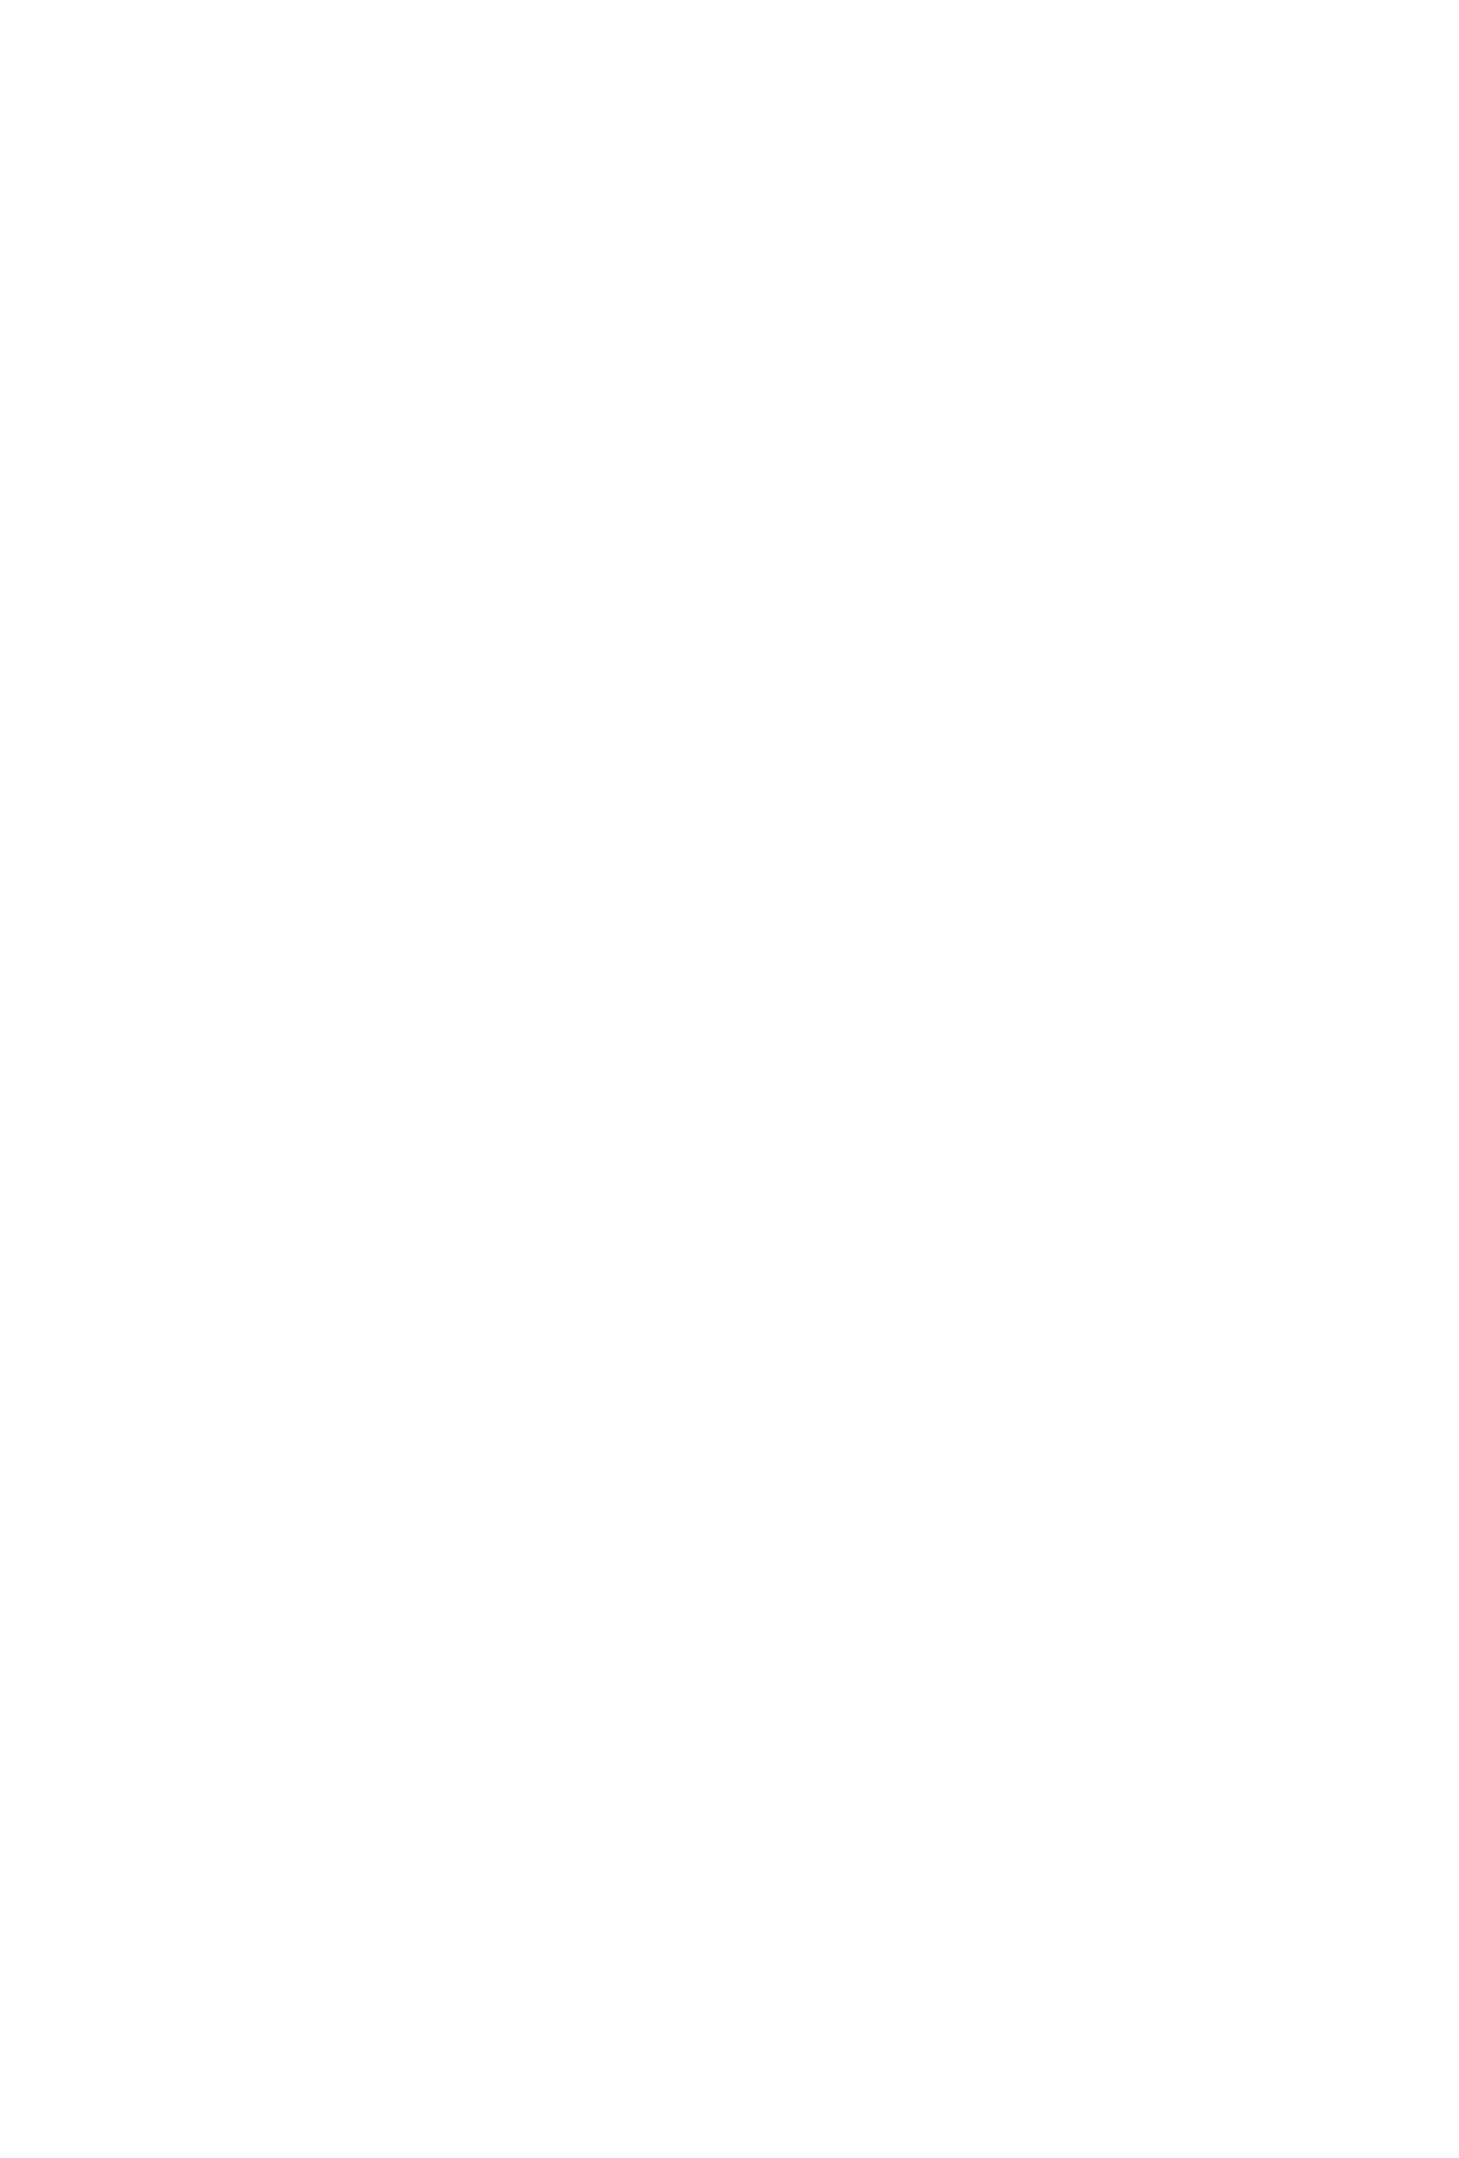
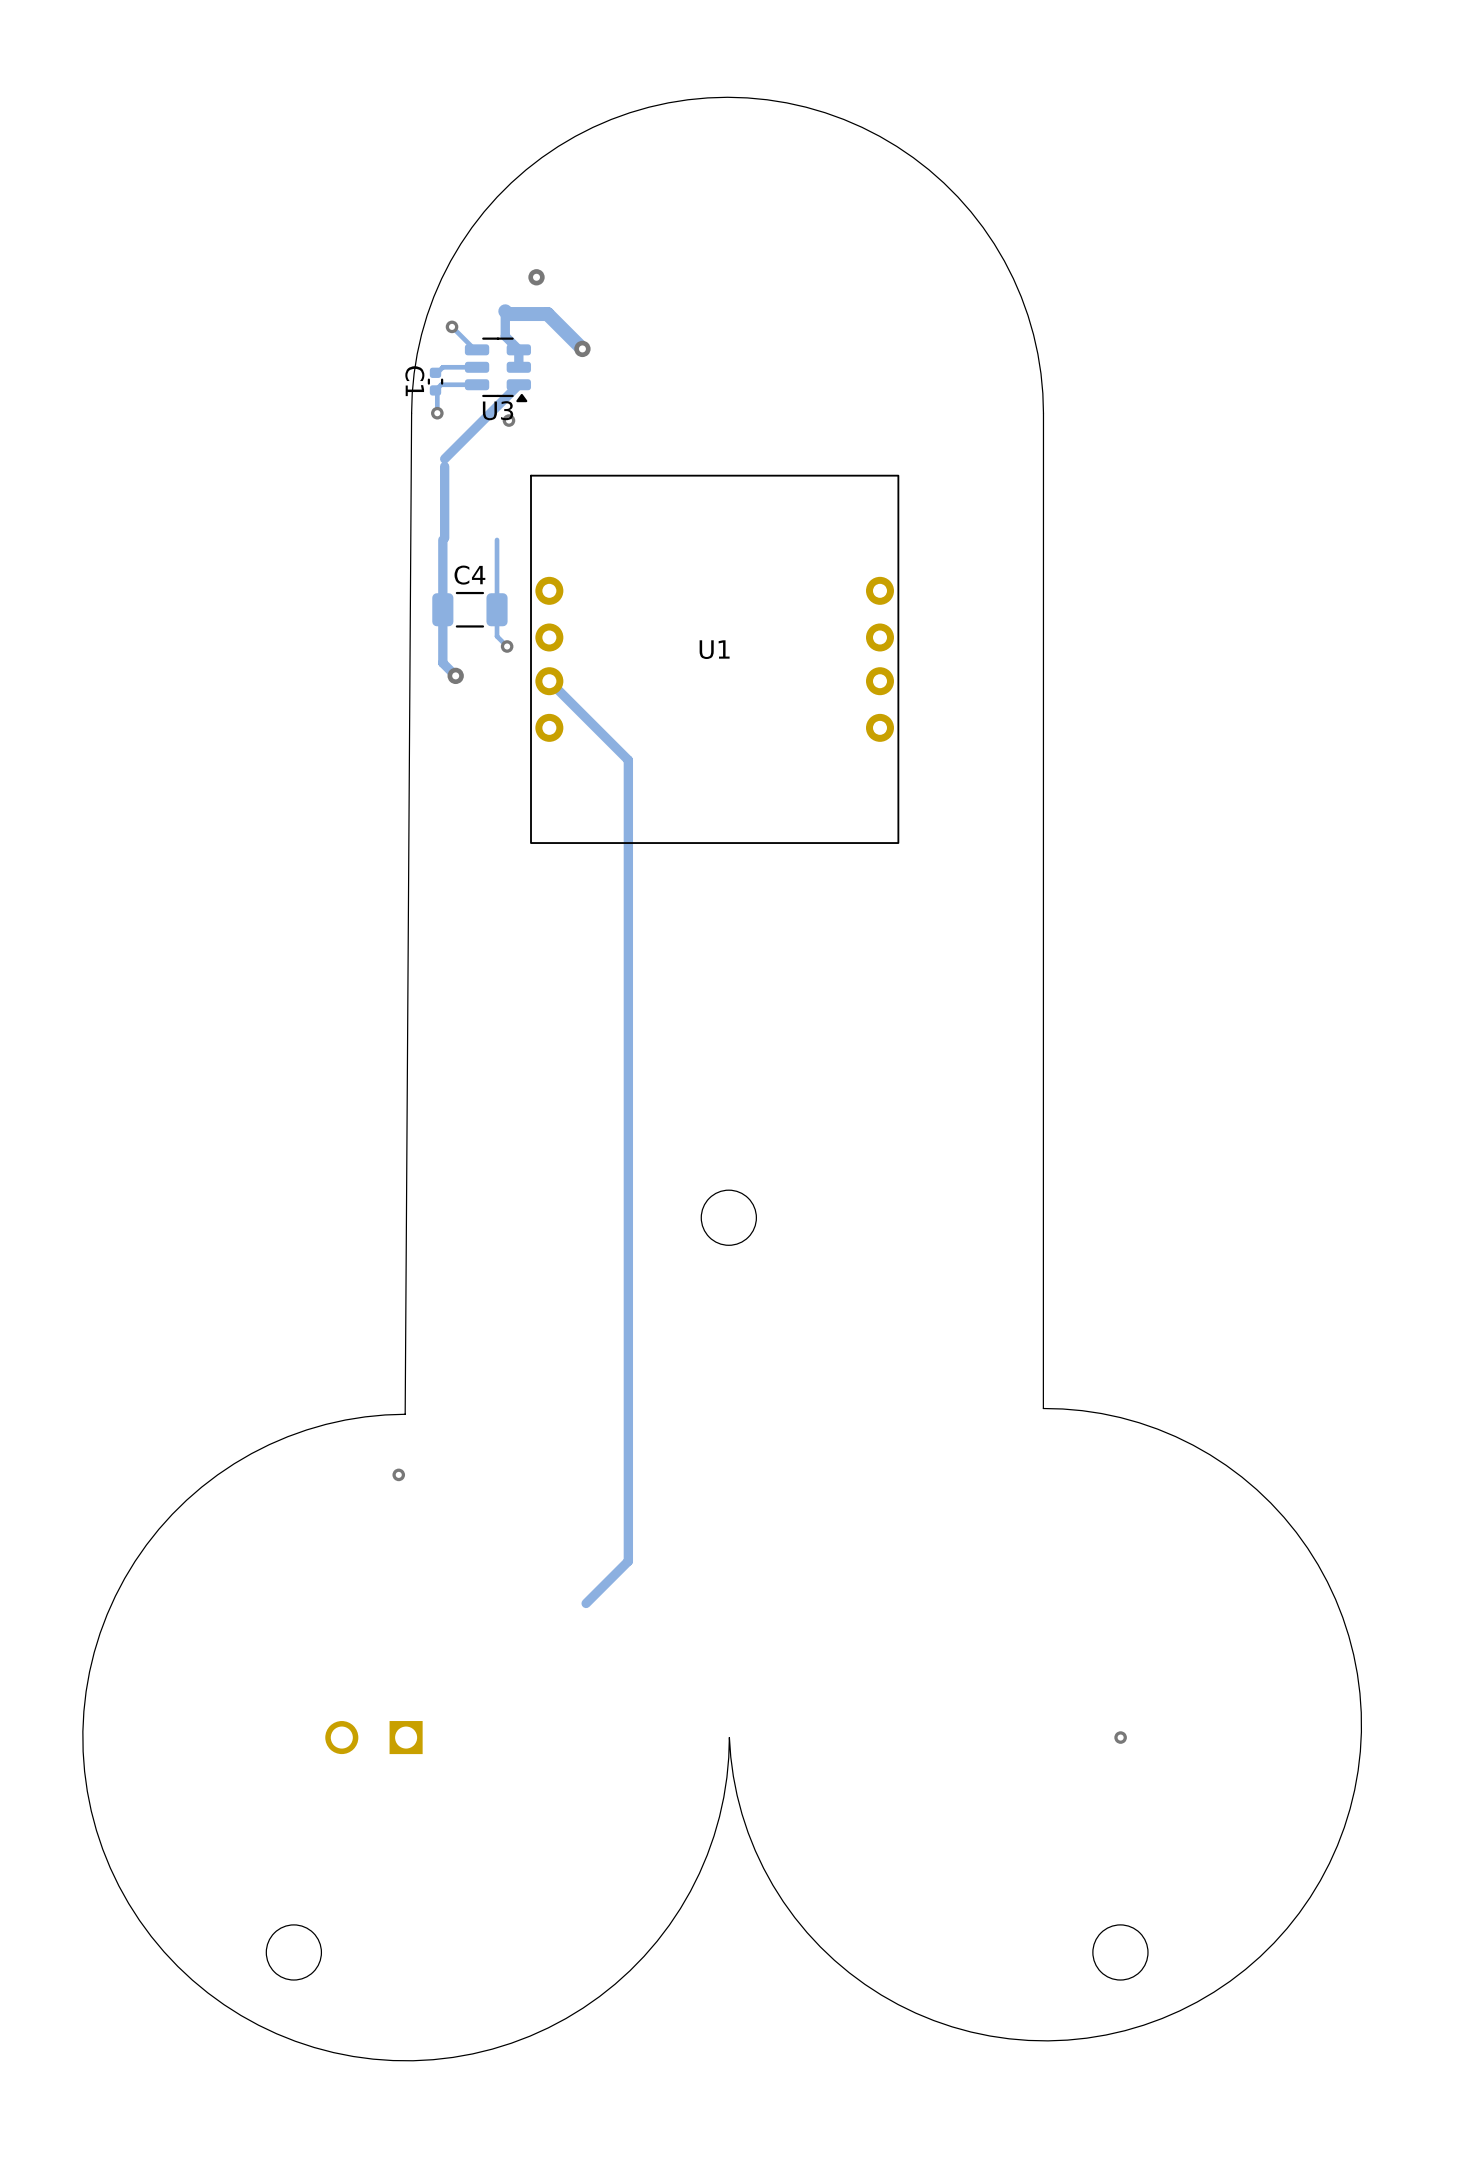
via: none -> (536, 277)
track: none -> (452, 326) (477, 349)
via: none -> (452, 326)
track: none -> (582, 348) (547, 314) (508, 314) (505, 311) (505, 336) (518, 349) (518, 367)
via: none -> (582, 348)
track: none -> (477, 367) (442, 367) (437, 372)
U3: none -> (497, 369)
C1: none -> (435, 381)
track: none -> (477, 384) (441, 384) (435, 390) (437, 392) (437, 413)
track: none -> (518, 384) (444, 458) (442, 663) (455, 675)
via: none -> (437, 413)
board edge: none -> (1043, 413) (1043, 1408) (1101, 1413) (1139, 1422) (1175, 1436) (1209, 1454) (1241, 1477) (1270, 1503) (1296, 1532) (1318, 1564) (1335, 1599) (1348, 1635) (1357, 1673) (1361, 1712) (1360, 1751) (1354, 1790) (1344, 1827) (1329, 1863) (1310, 1897) (1274, 1942) (1230, 1981) (1197, 2002) (1161, 2018) (1106, 2035) (1048, 2040) (989, 2036) (933, 2020) (898, 2004) (849, 1972) (807, 1932) (783, 1901) (755, 1850) (737, 1795) (729, 1737) (726, 1777) (719, 1816) (707, 1855) (690, 1891) (669, 1925) (644, 1956) (615, 1984) (583, 2008) (548, 2027) (511, 2043) (472, 2053) (433, 2059) (393, 2060) (353, 2056) (314, 2047) (258, 2025) (224, 2004) (177, 1966) (151, 1936) (118, 1885) (96, 1830) (87, 1791) (83, 1751) (83, 1711) (94, 1652) (115, 1596) (146, 1544) (186, 1500) (234, 1463) (287, 1436) (345, 1420) (405, 1414) (412, 393) (421, 334) (441, 278) (460, 243) (497, 196) (526, 169) (575, 136) (629, 112) (668, 102) (727, 97) (786, 102) (825, 112) (879, 136) (928, 169) (970, 211) (994, 243) (1021, 296) (1037, 354) (1043, 413)
via: none -> (508, 420)
track: none -> (497, 539) (497, 636) (507, 646)
C4: none -> (469, 609)
via: none -> (507, 646)
U1: none -> (714, 659)
via: none -> (455, 675)
track: none -> (549, 681) (628, 760) (628, 1561) (586, 1603)
round board edge: none -> [700, 1189, 757, 1246]
via: none -> (398, 1474)
part: none -> (373, 1737)
via: none -> (1120, 1737)
round board edge: none -> [265, 1924, 322, 1981]
round board edge: none -> [1092, 1924, 1149, 1981]

